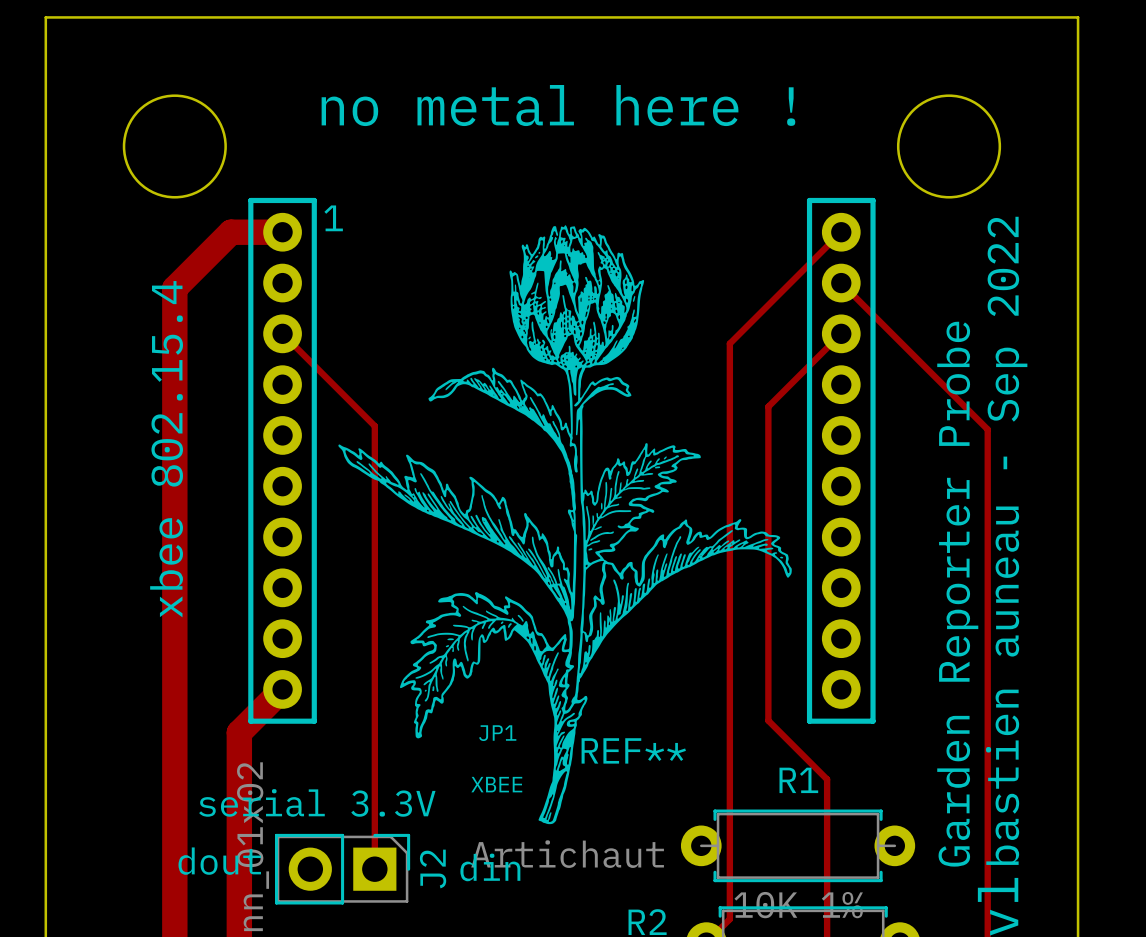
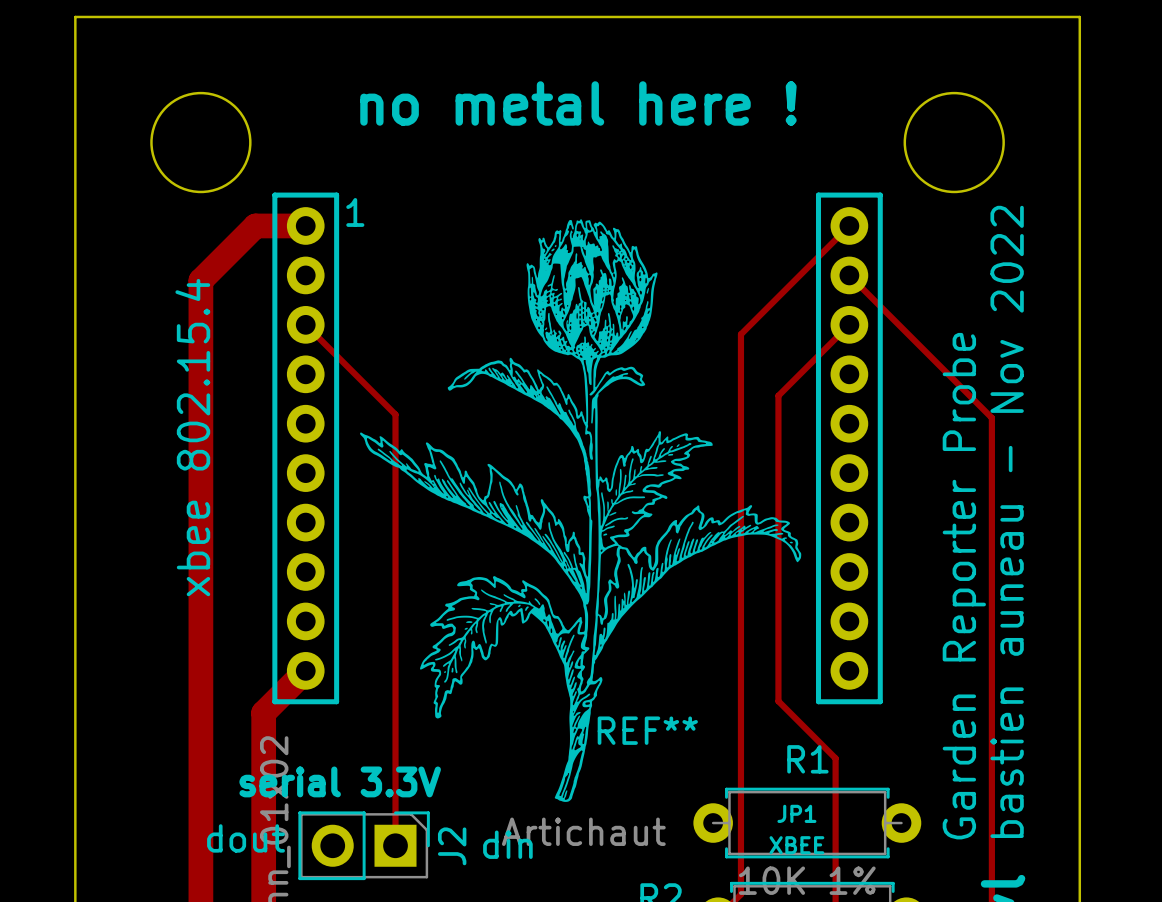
text: bastien auneau - Sep 2022 (1006, 540) -> bastien auneau - Nov 2022 (1007, 521)
JP1 name position: JP1 (497, 733) -> JP1 (796, 813)
JP1 value position: XBEE (496, 784) -> XBEE (796, 845)

